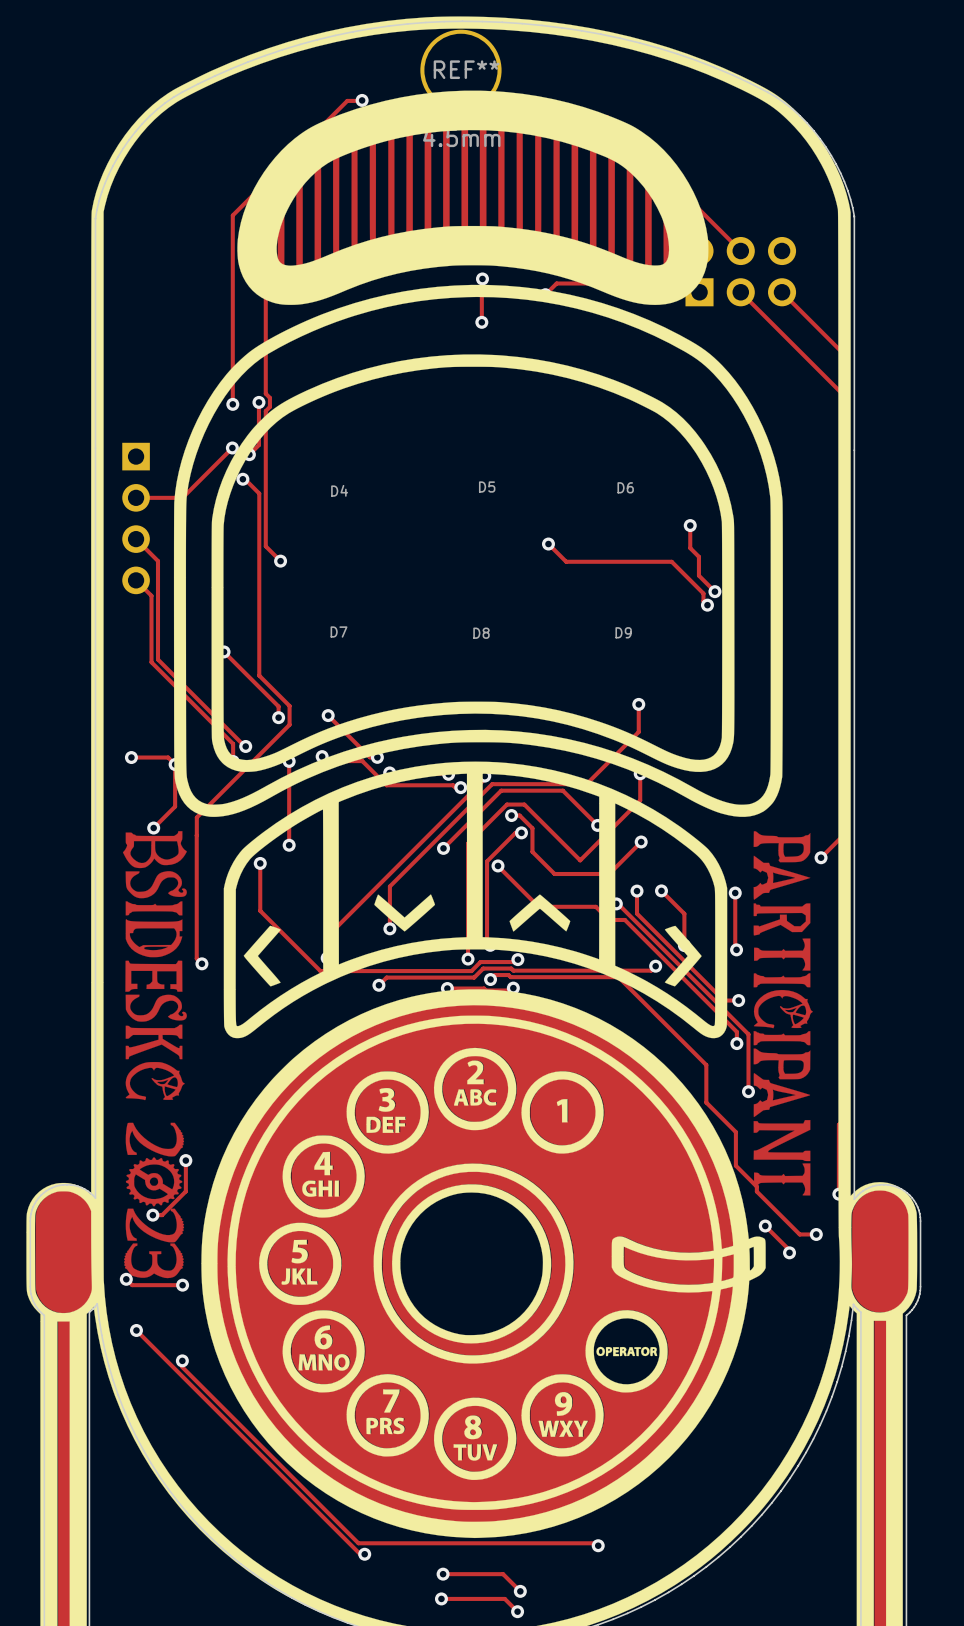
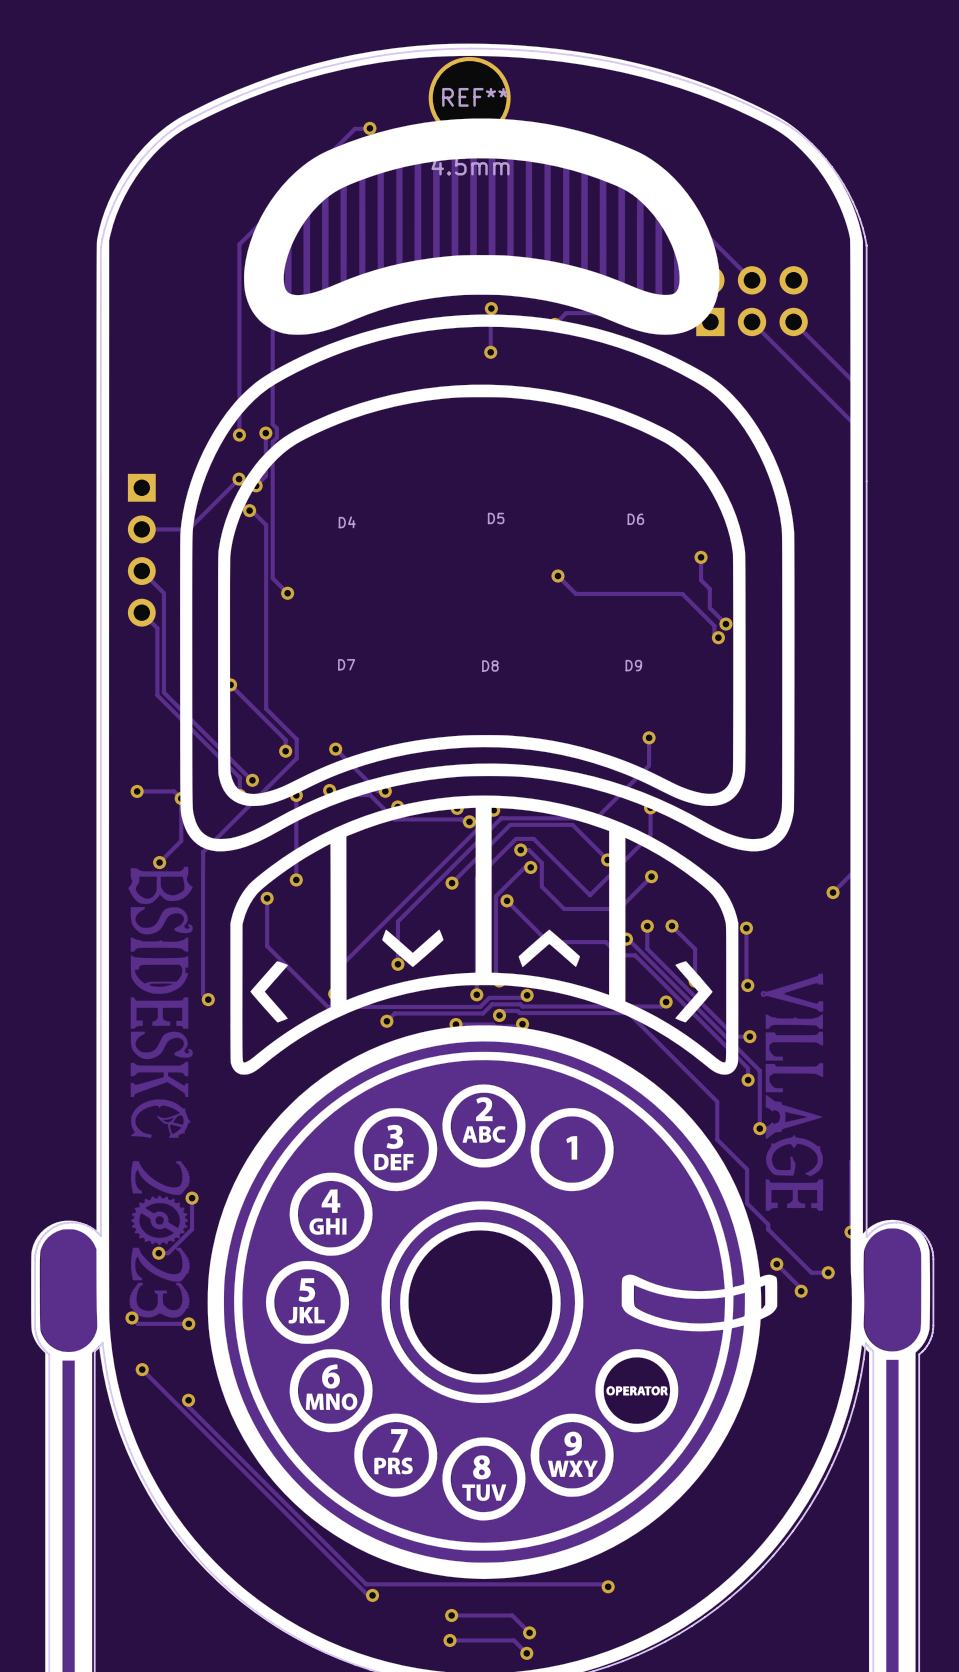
drawing shape: [122, 831, 813, 1279] -> [128, 866, 824, 1318]

